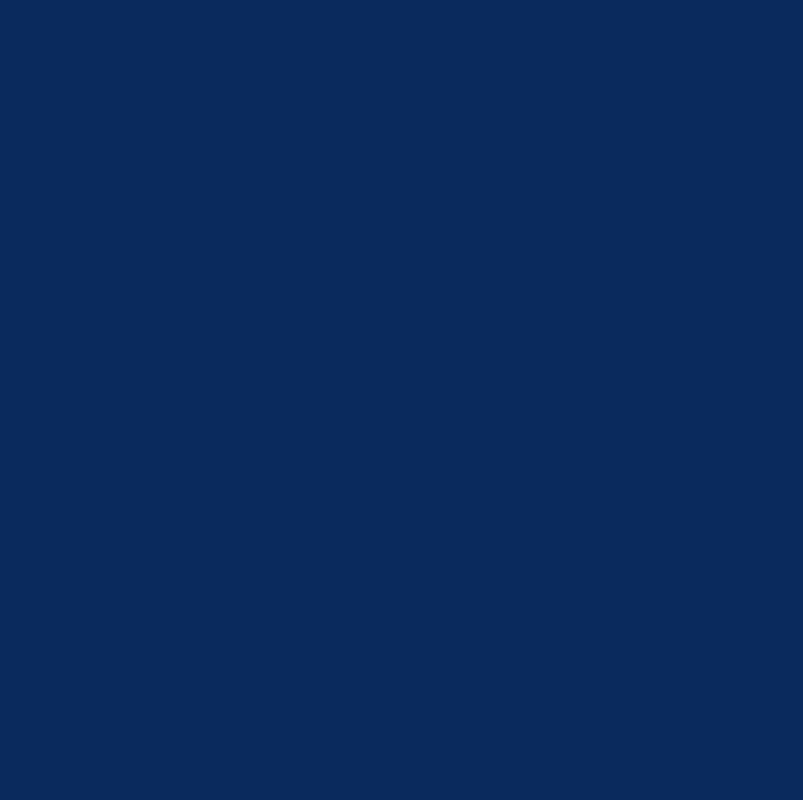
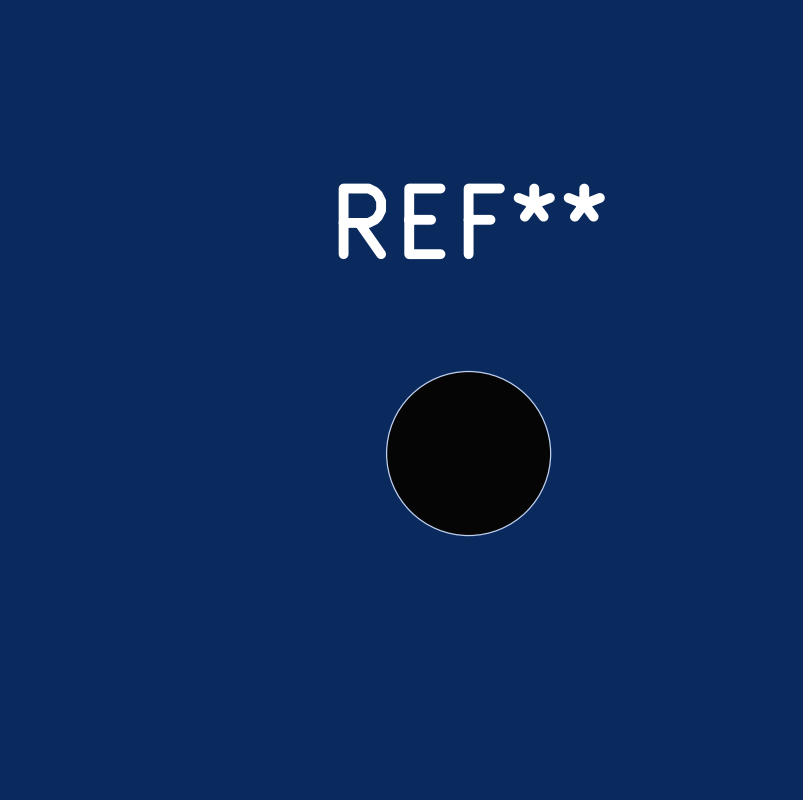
REF**: none -> (468, 453)

